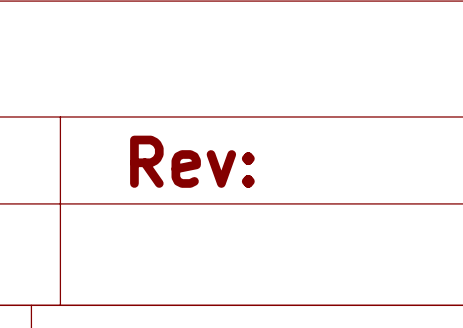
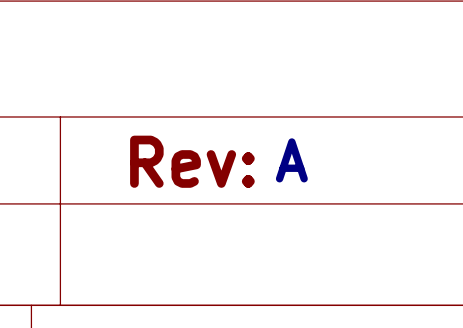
text: none -> A (291, 160)

